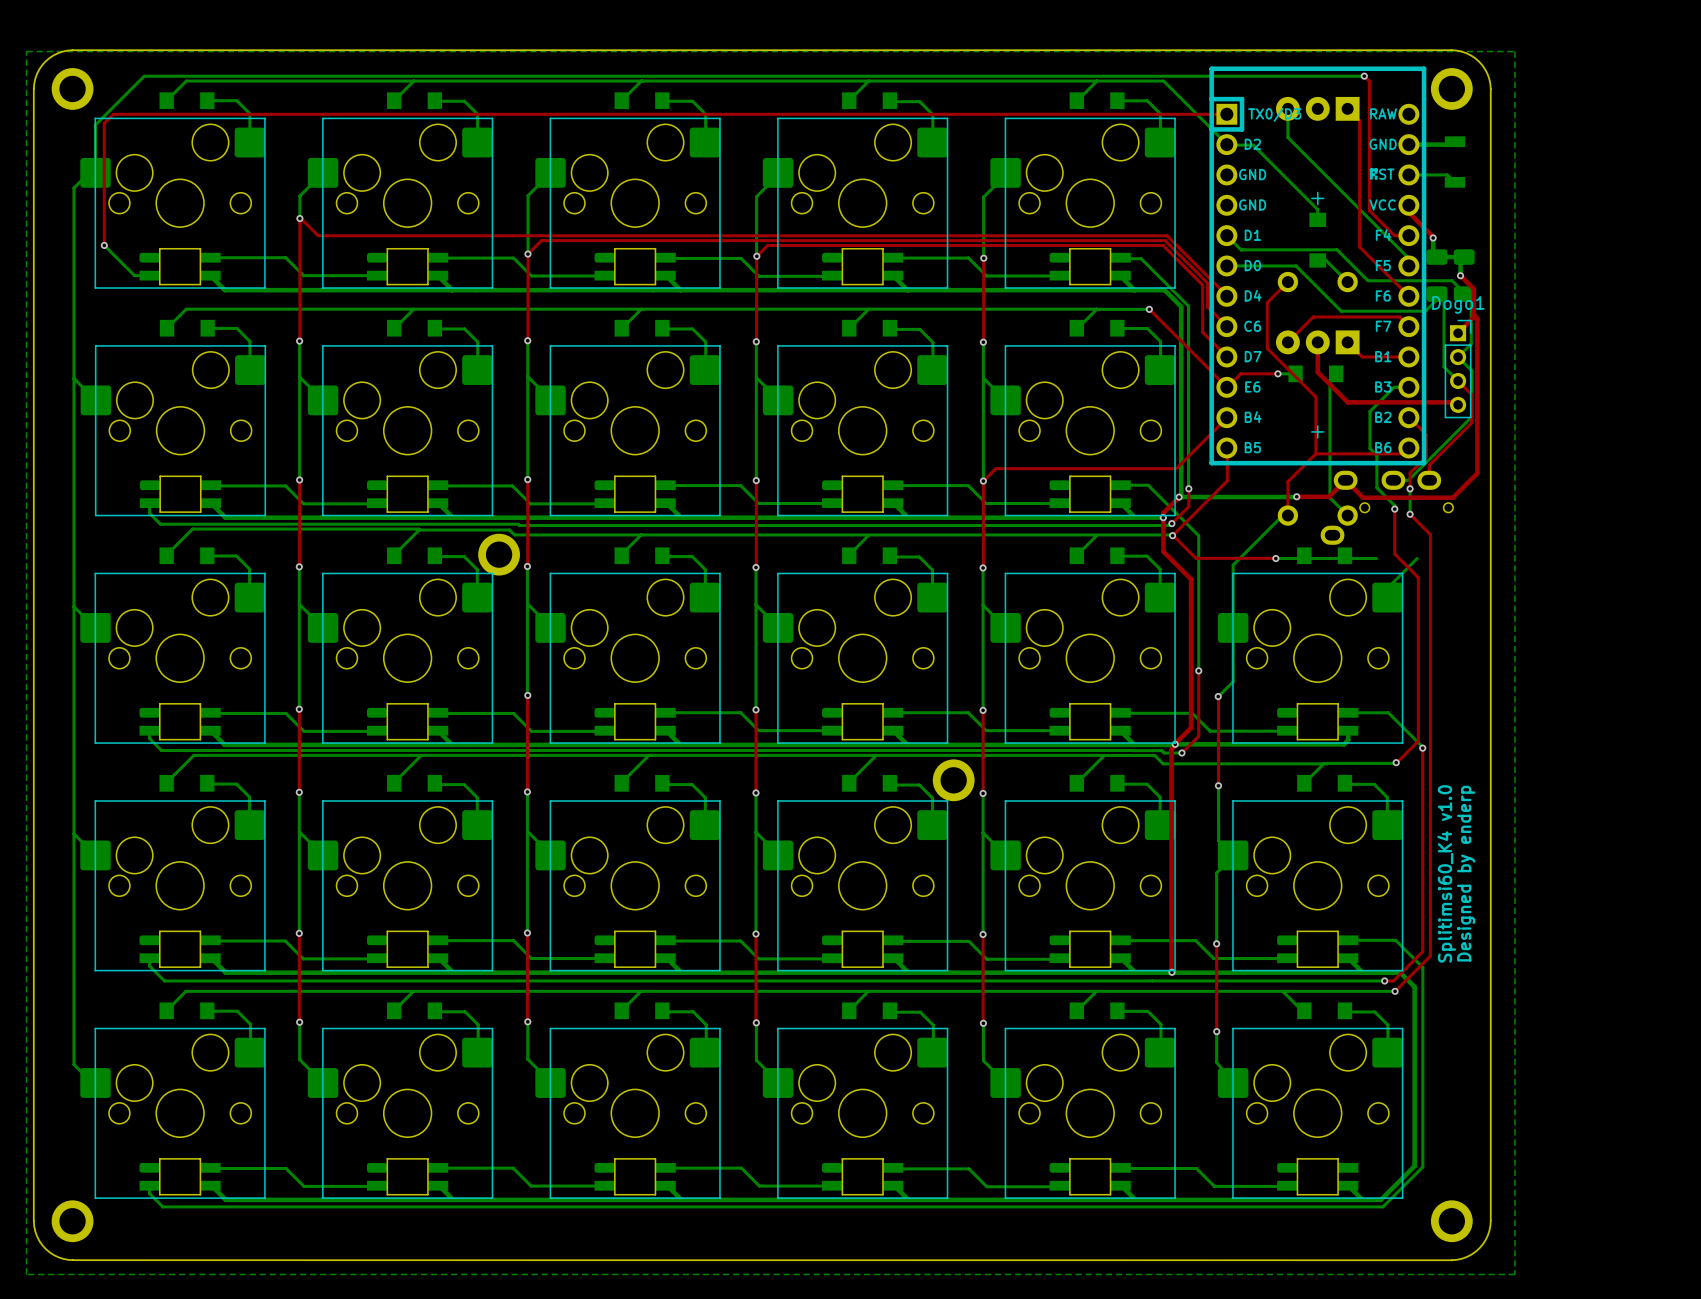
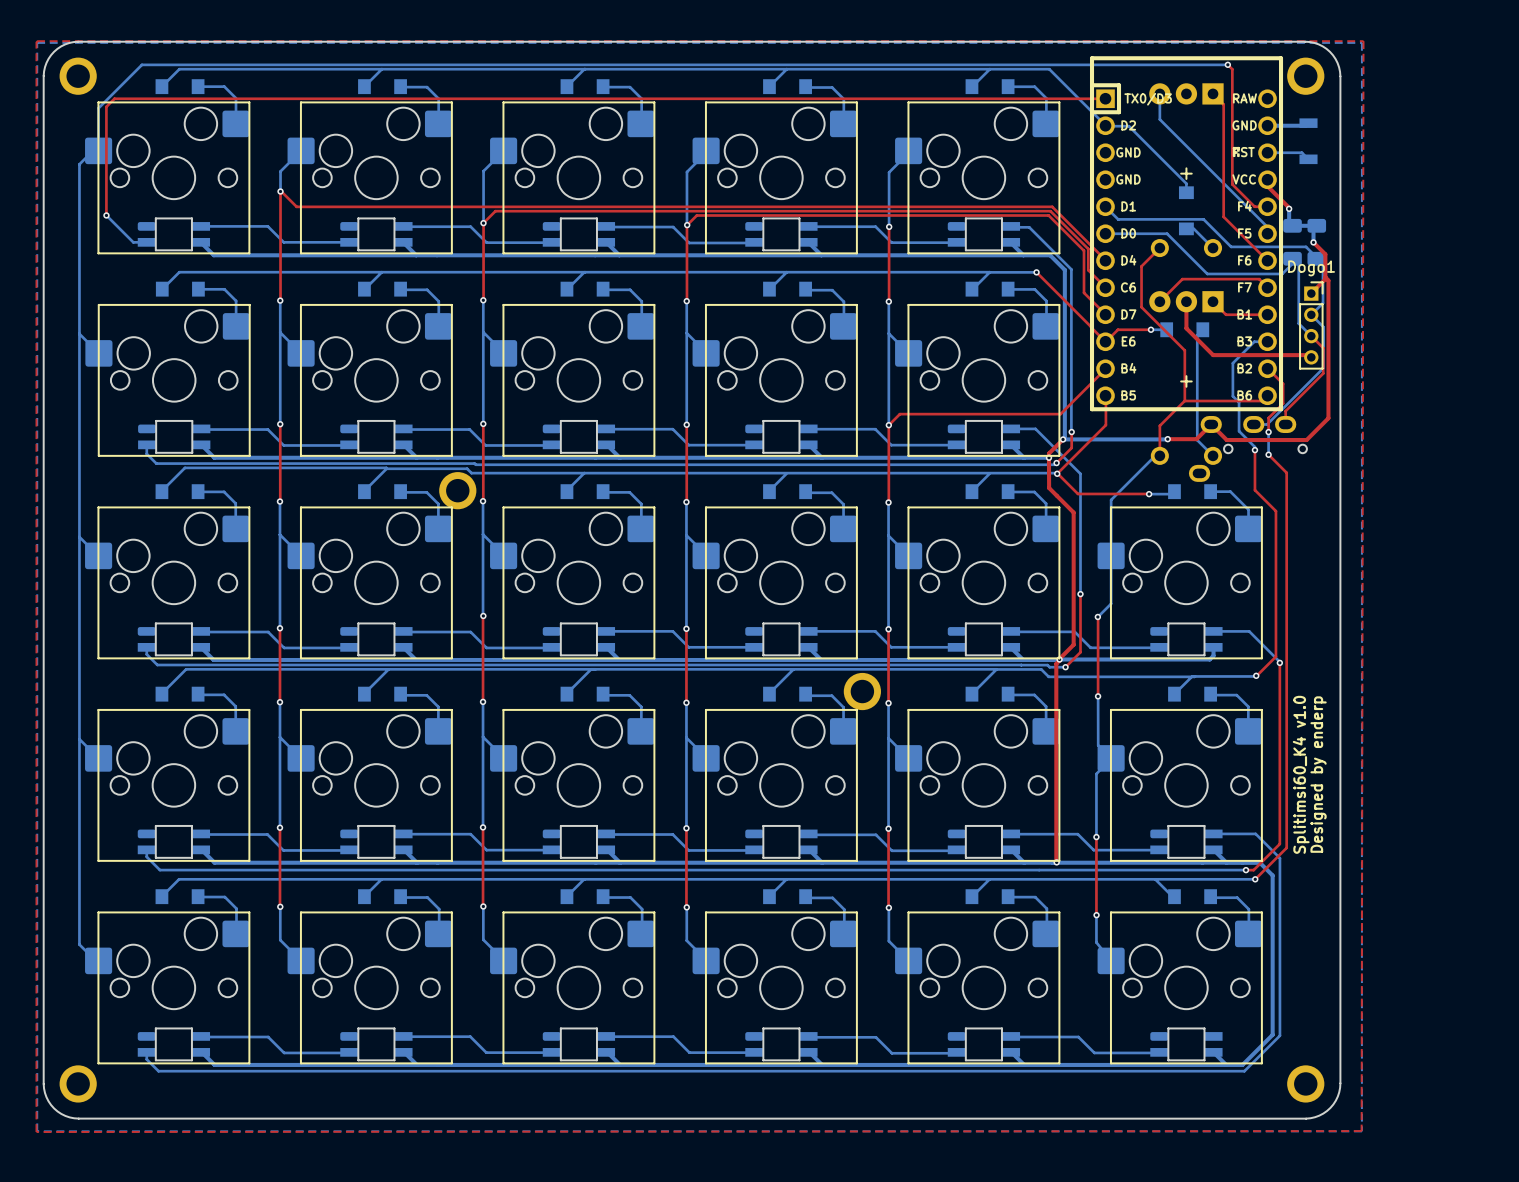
top zone outline: none -> (37, 41) (36, 1132) (1361, 1131) (1363, 41) (37, 41)
bottom track: (1275, 558) (1376, 558) -> (1149, 494) (1171, 494) (1174, 491)
bottom track: (1417, 558) (1387, 588) -> (1210, 491) (1230, 491) (1248, 509) (1248, 520)

